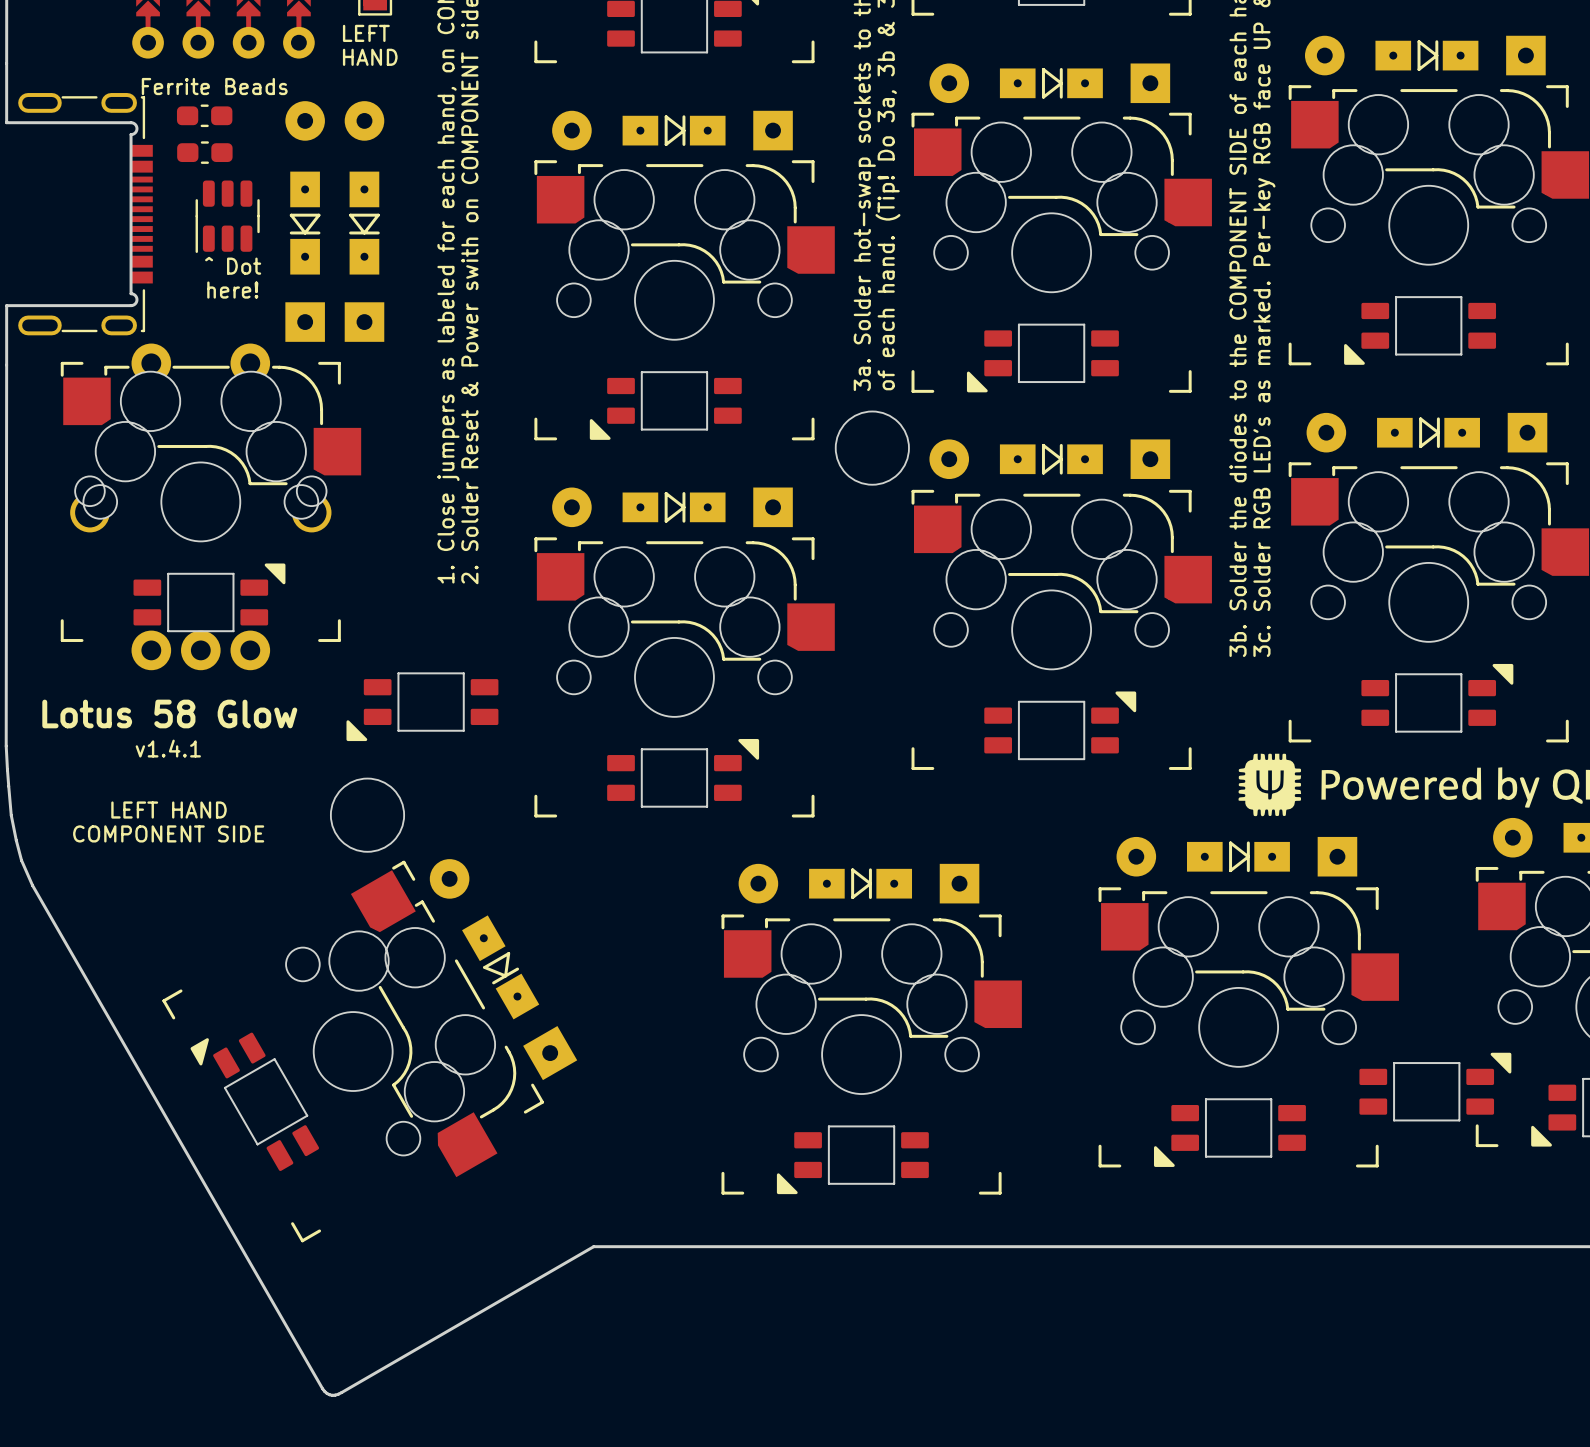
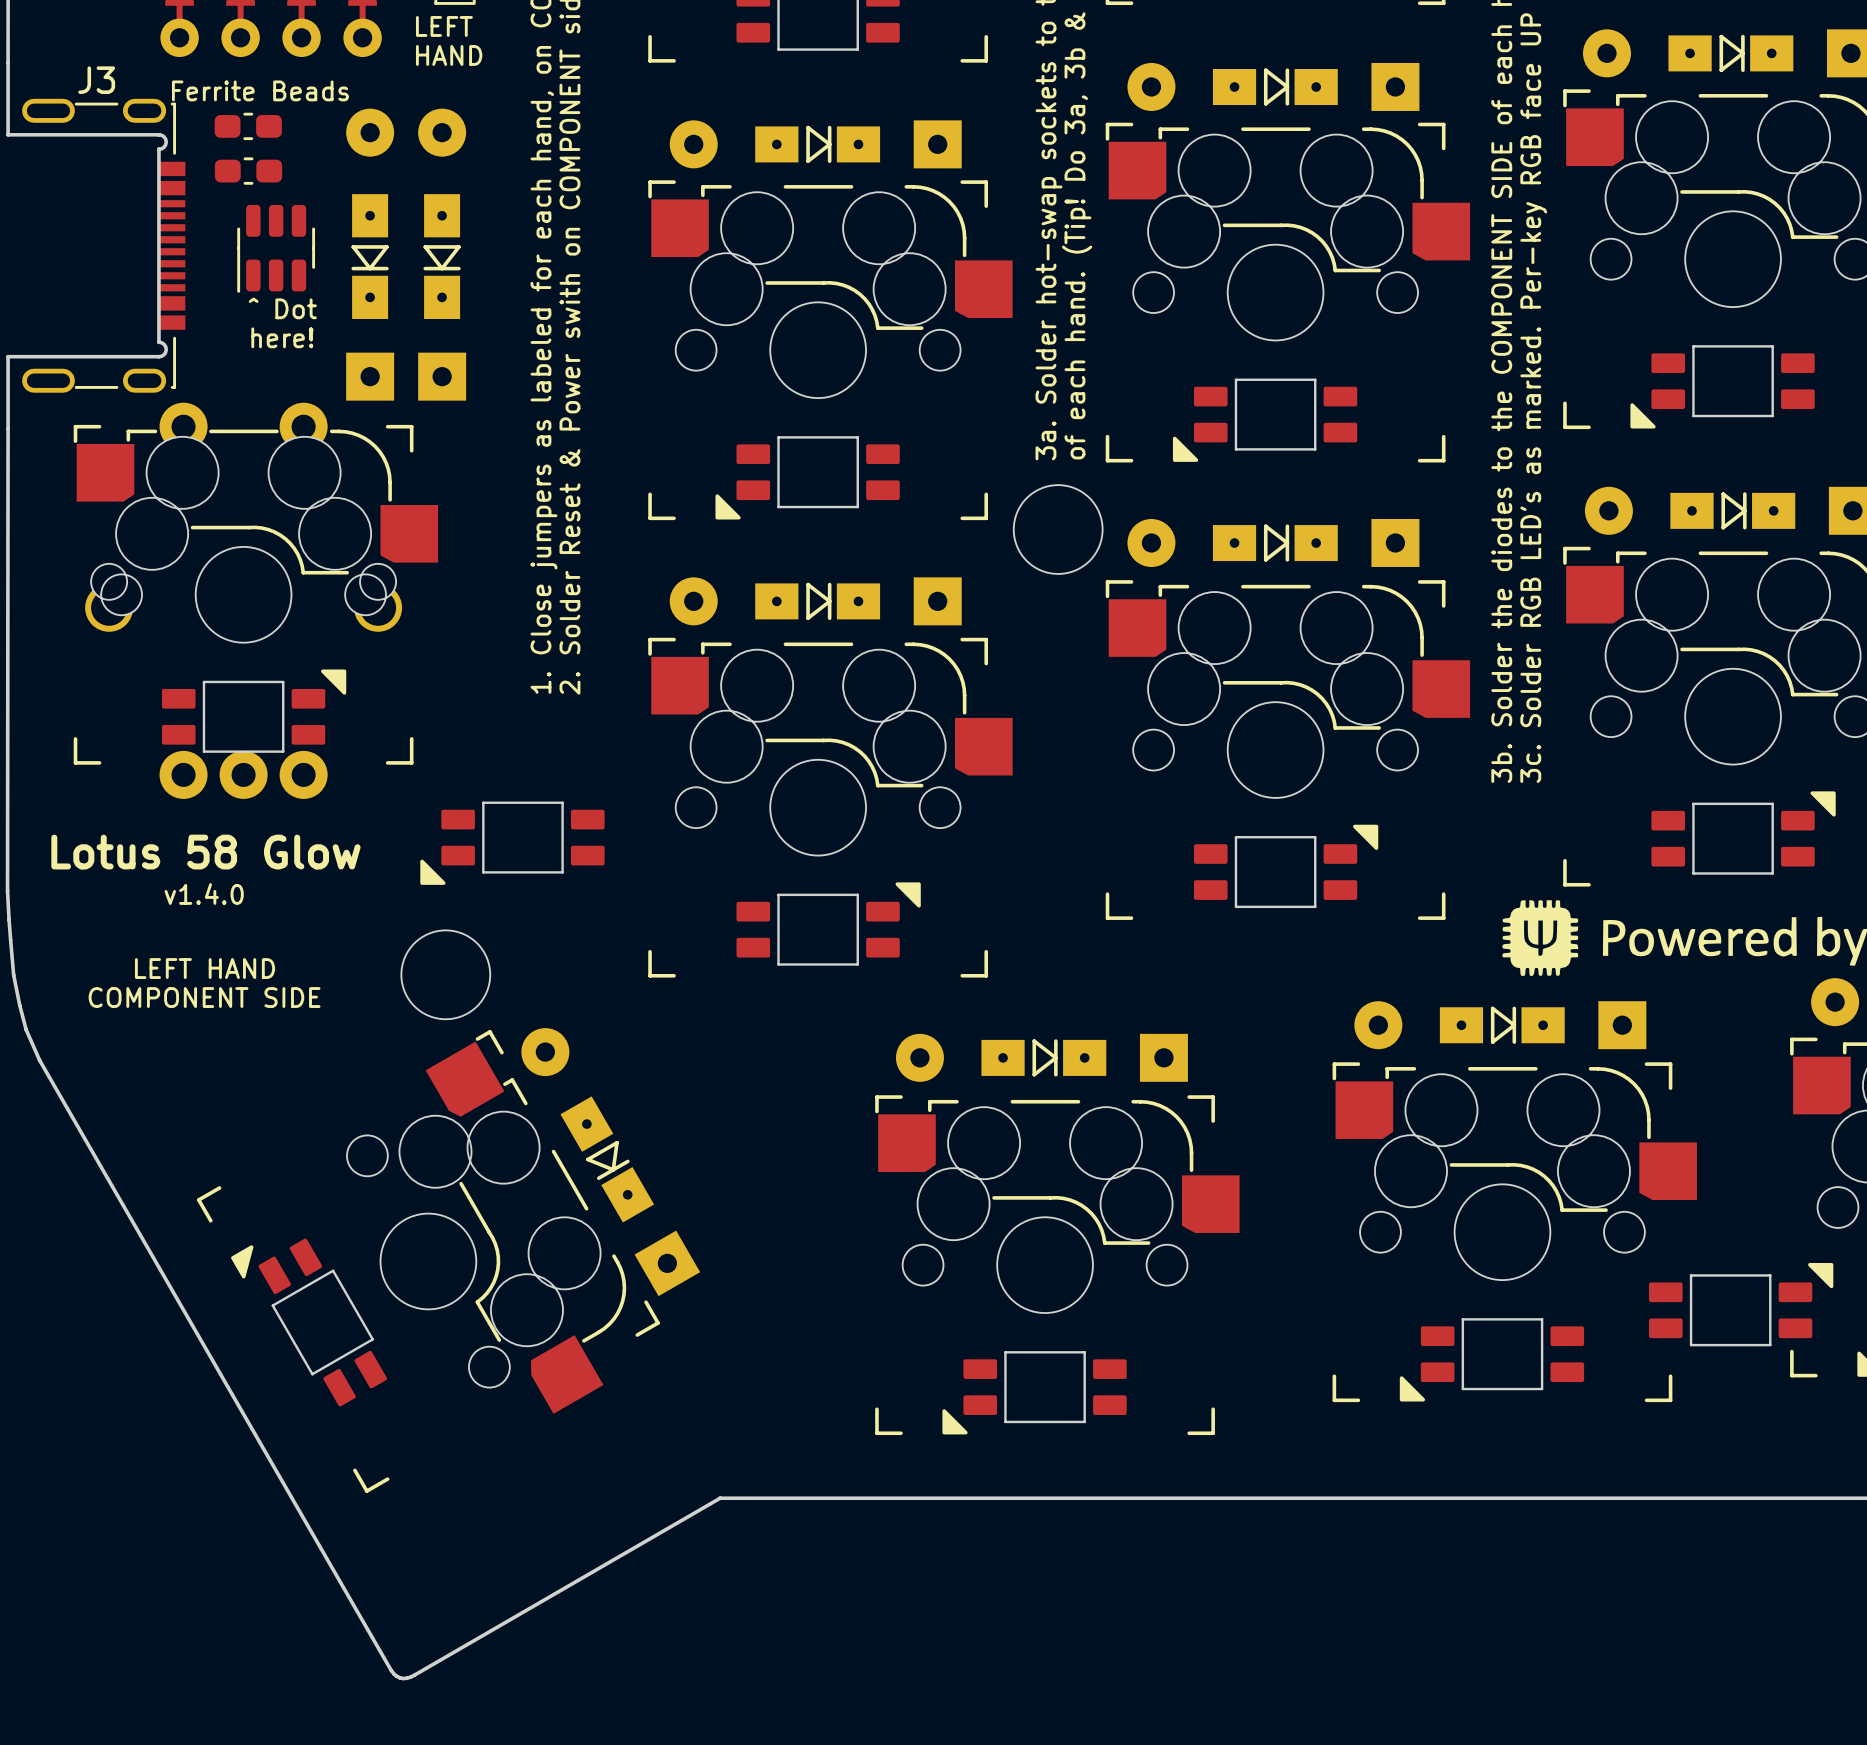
J3 name: none -> J3 (96, 80)
text: v1.4.1 (168, 748) -> v1.4.0 (204, 893)

